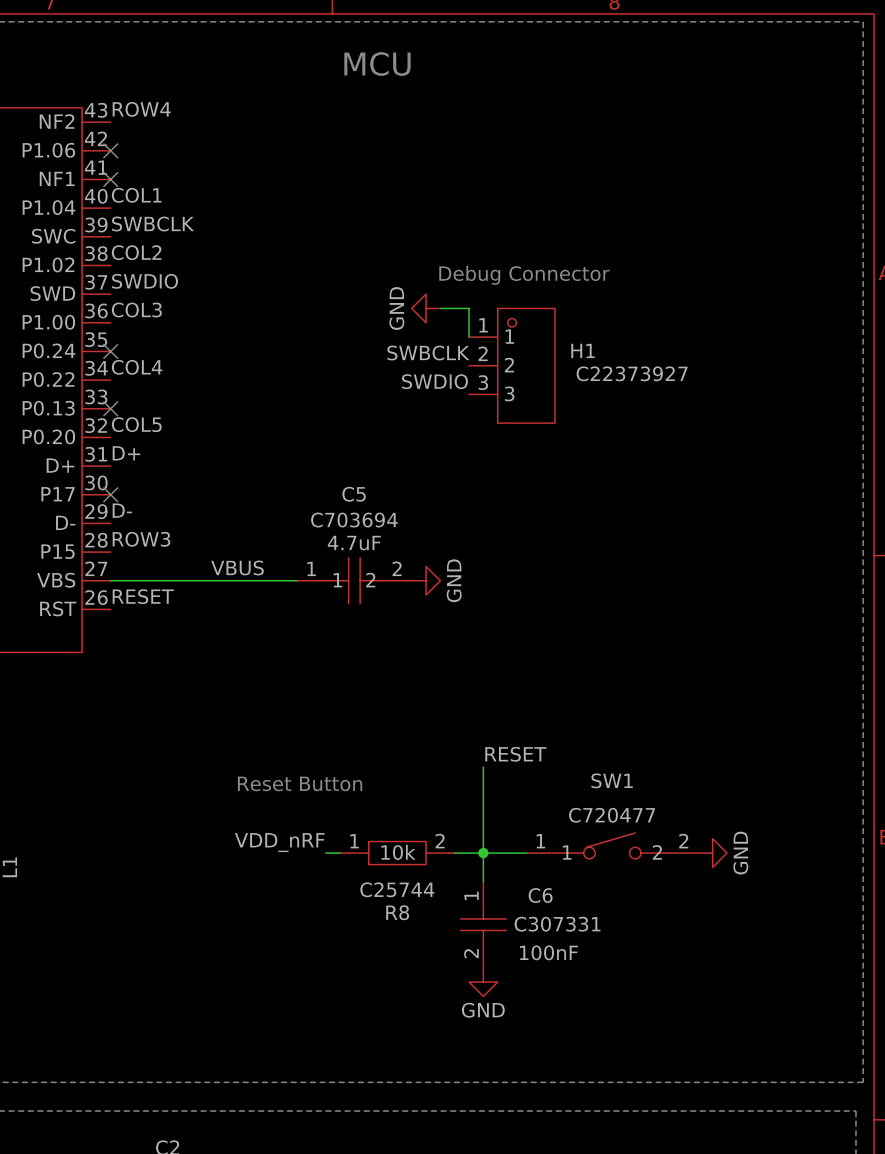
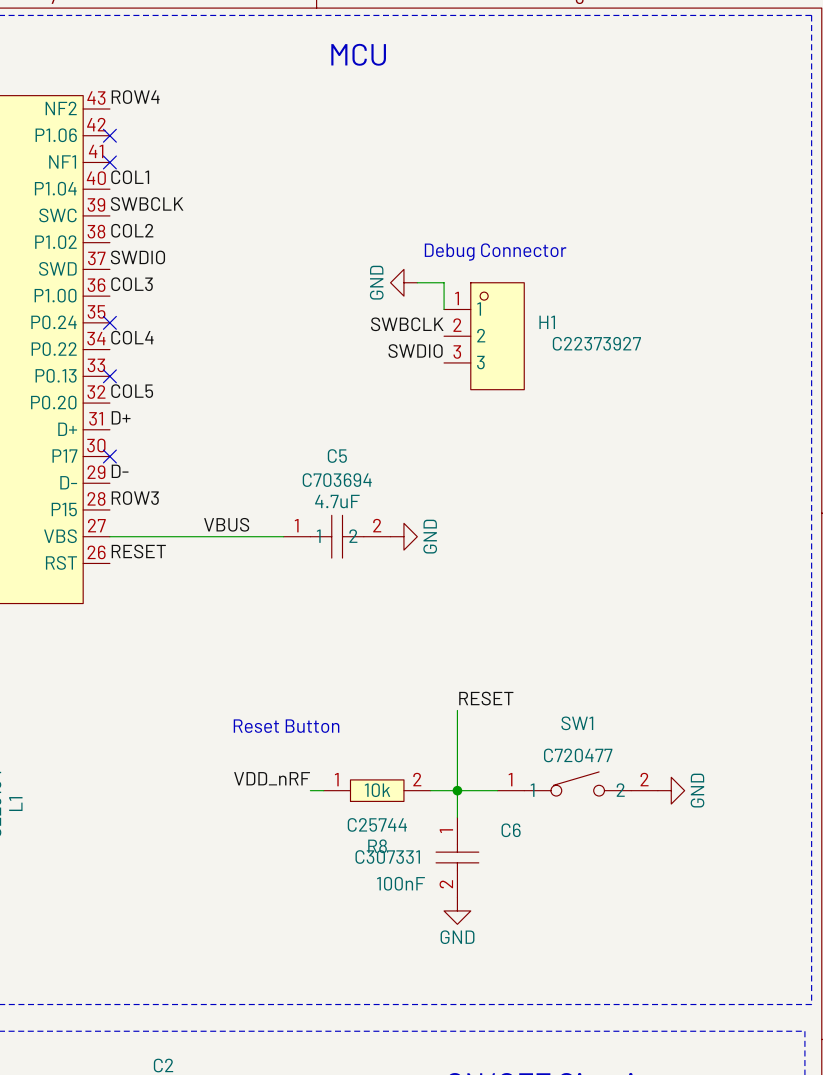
C6 text position: C307331 (557, 924) -> C307331 (387, 857)
C6 text position: 100nF (548, 952) -> 100nF (400, 883)

